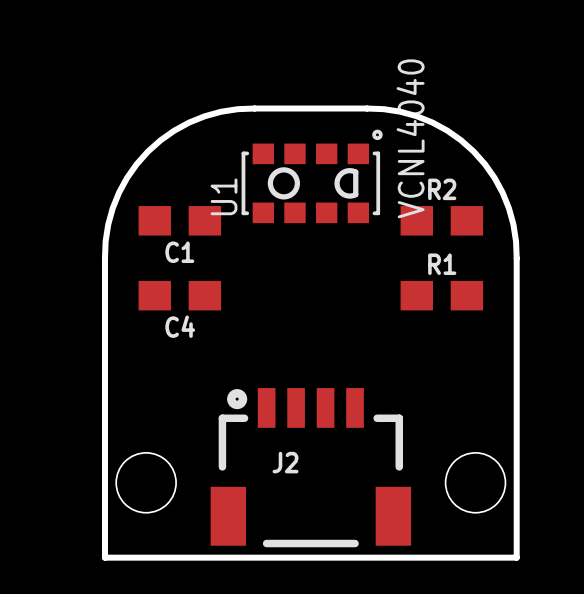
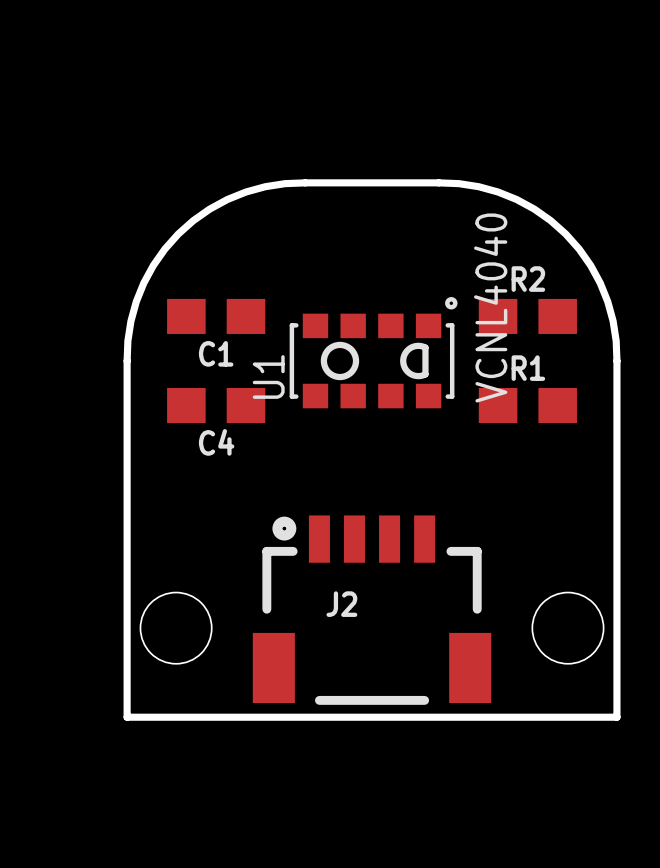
U1 position: (312, 176) -> (373, 352)

